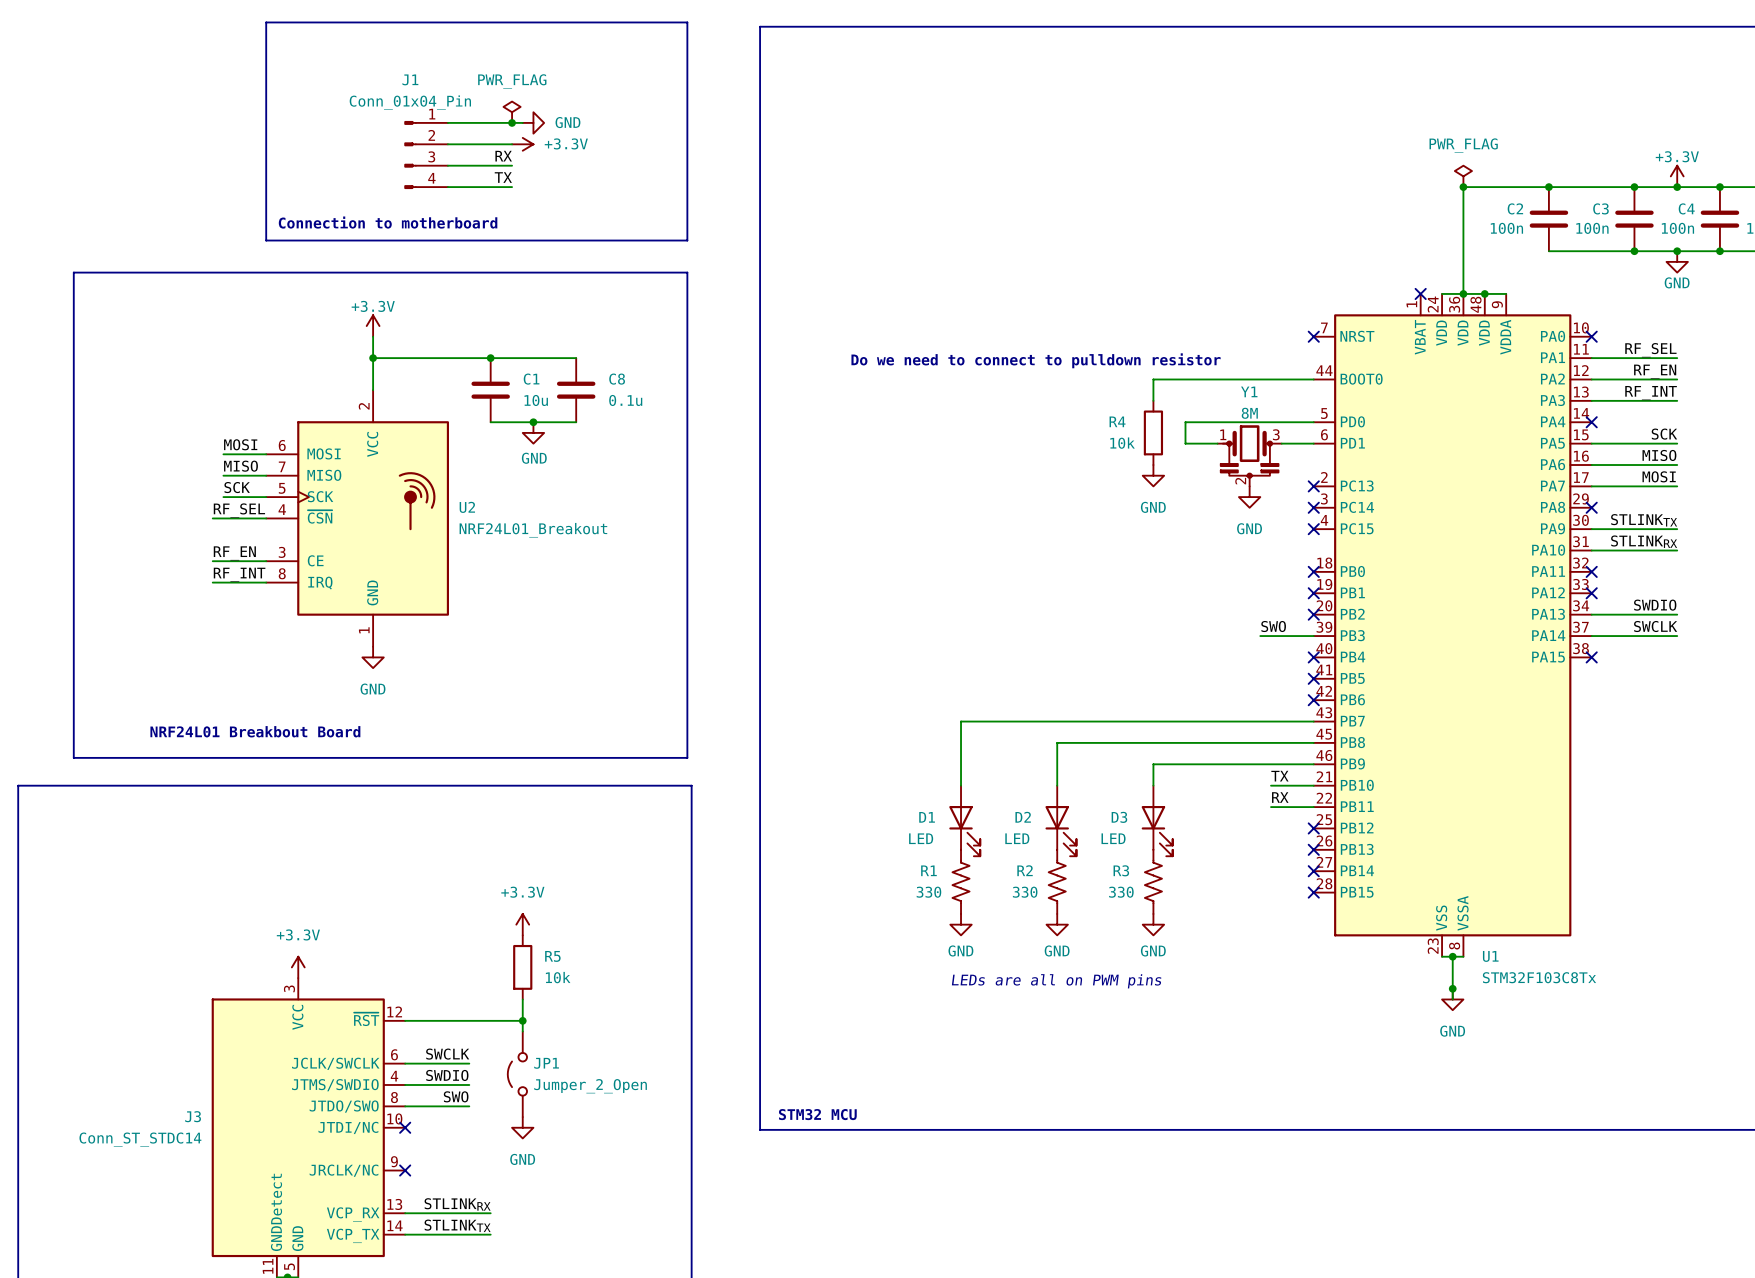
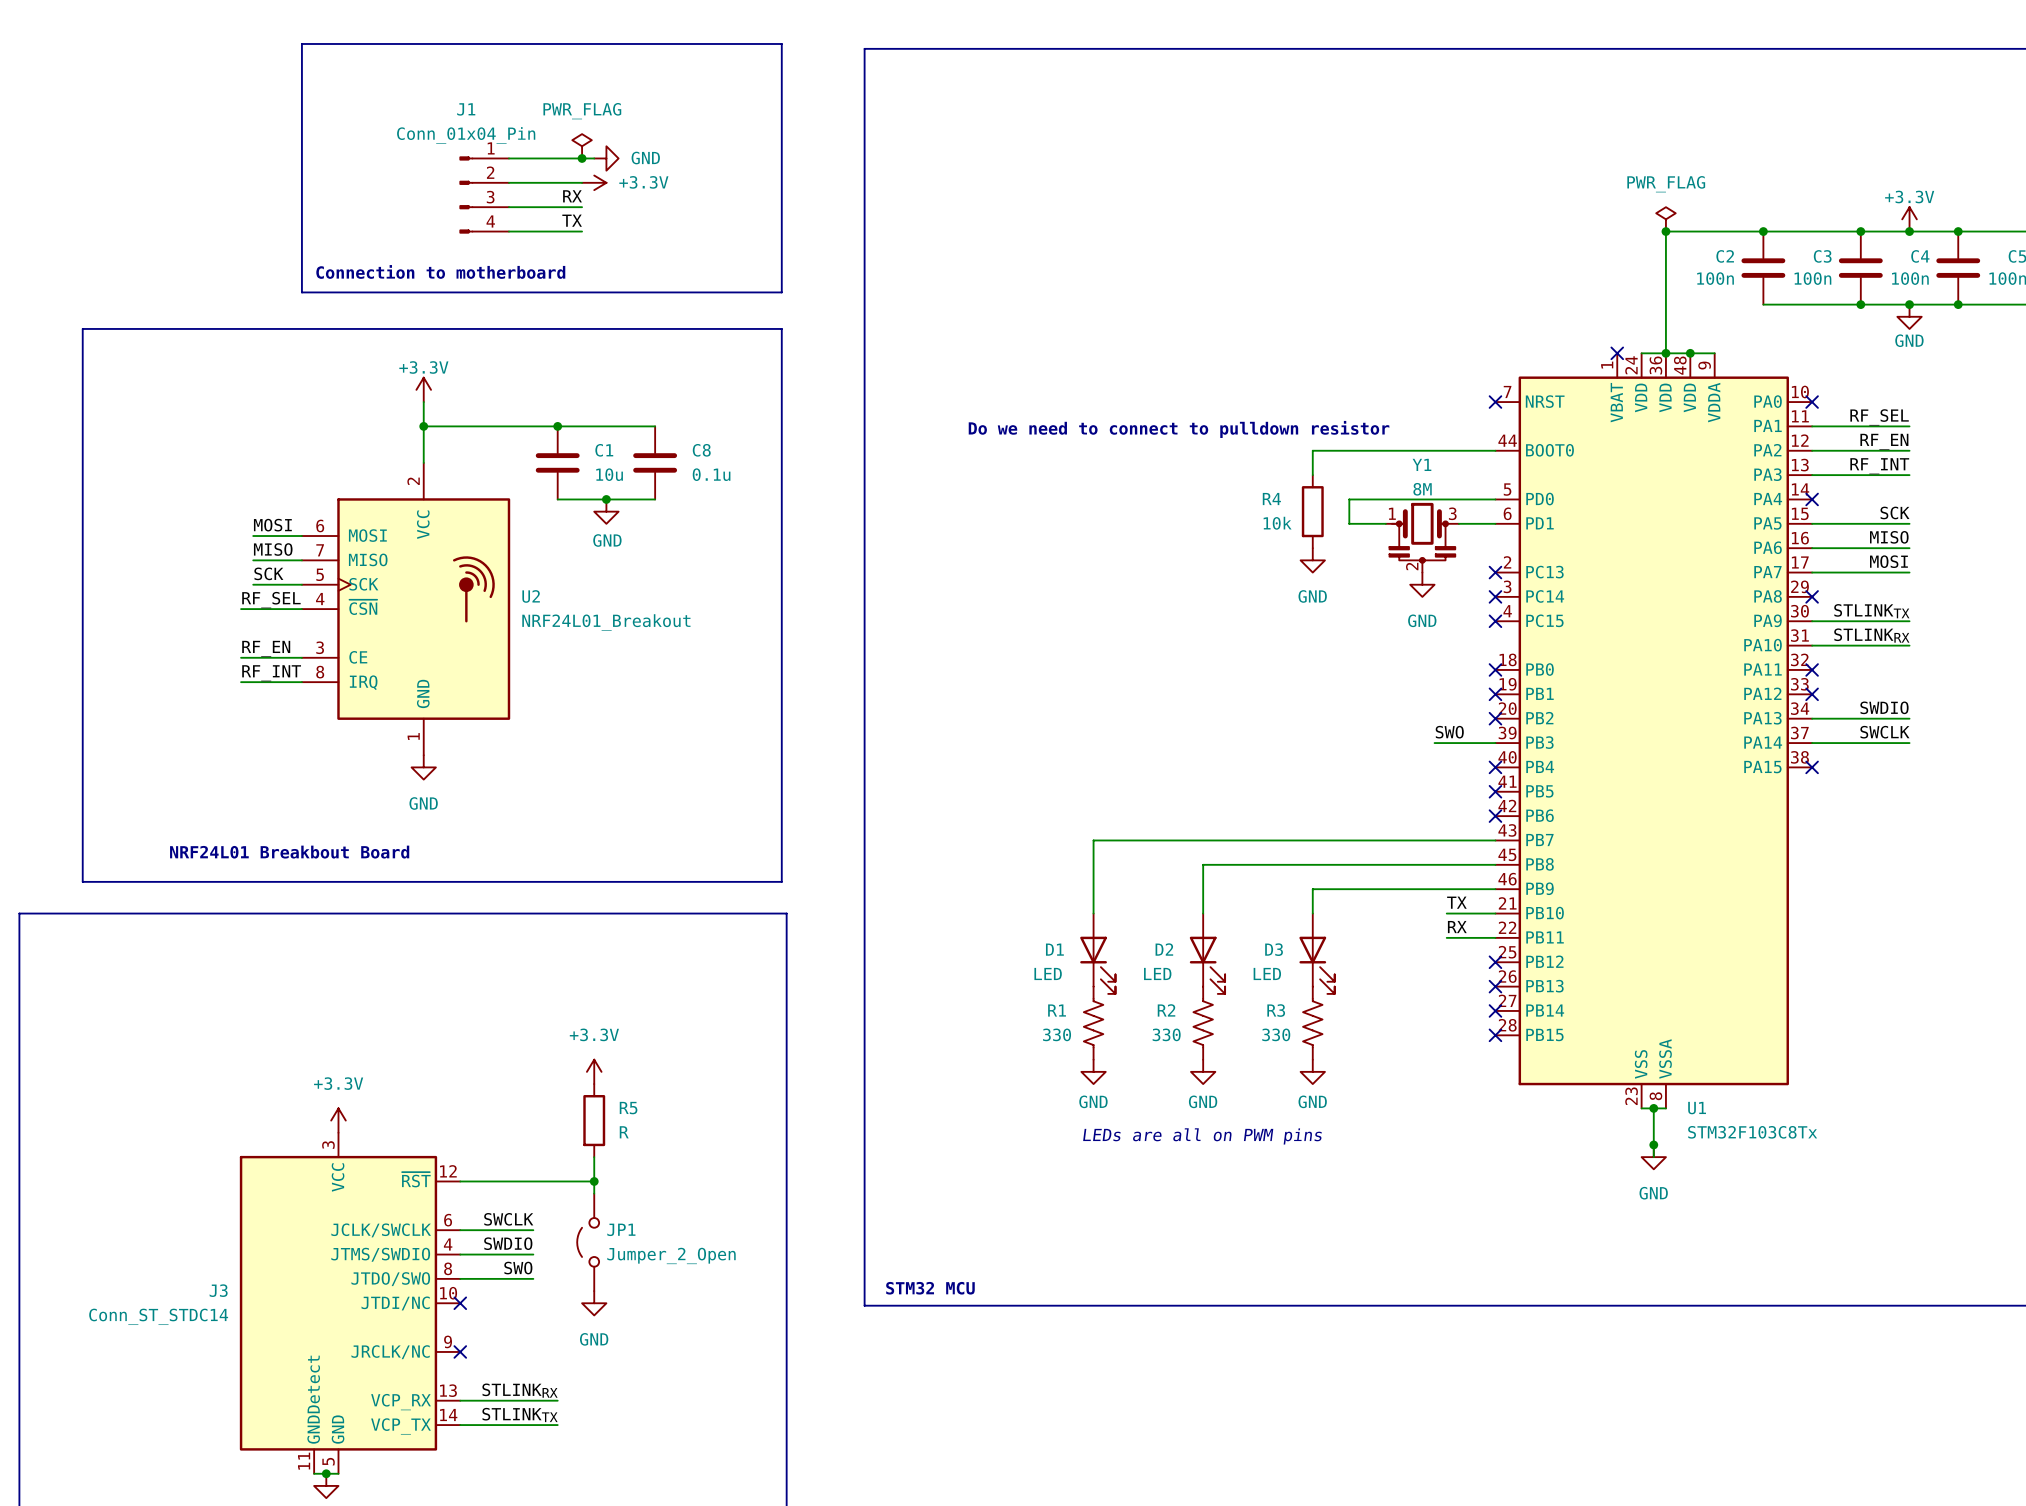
R5 value: 10k (558, 977) -> R (624, 1132)

